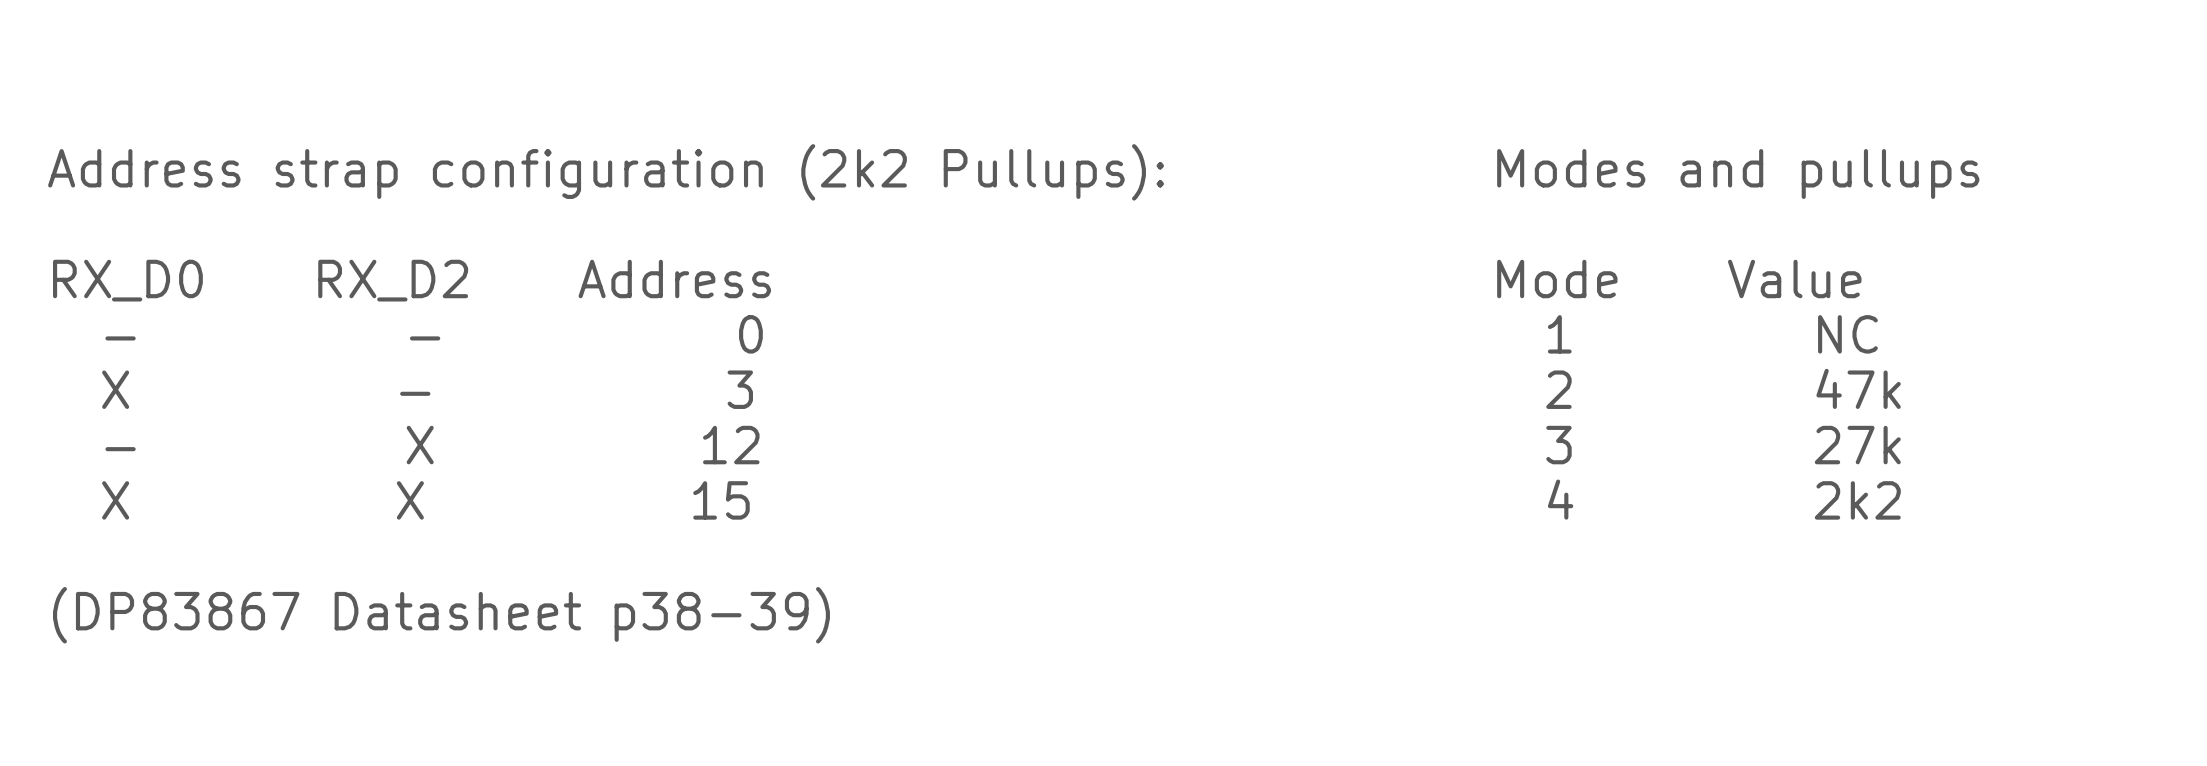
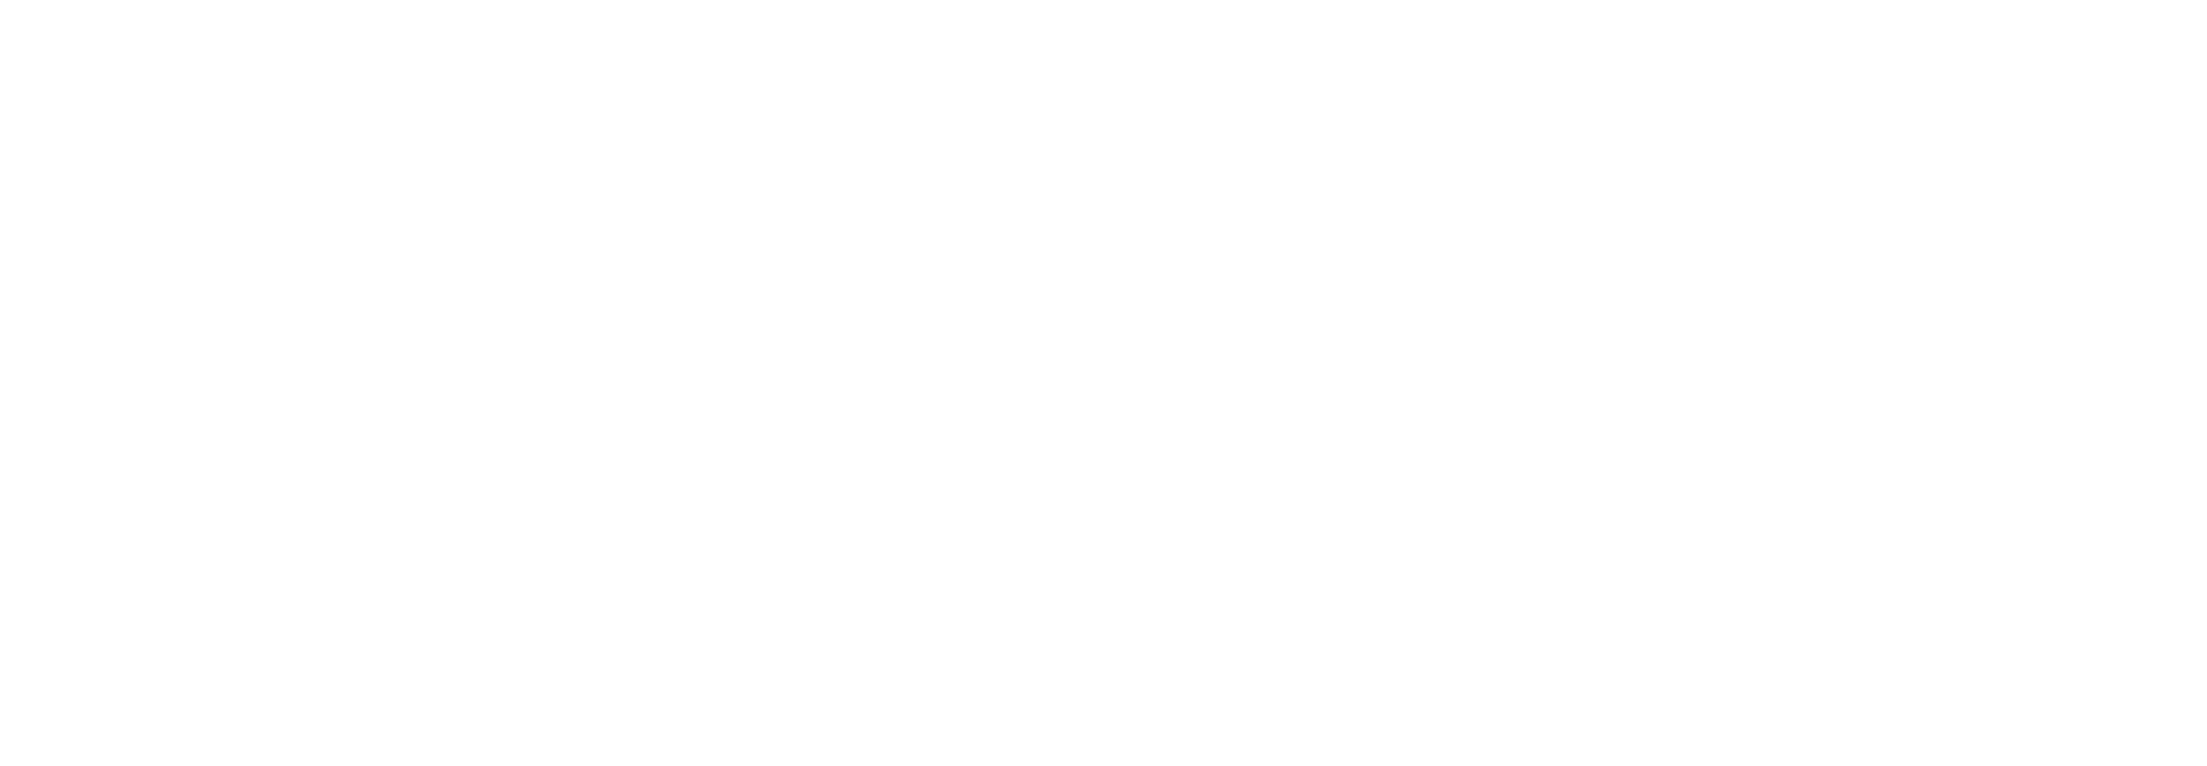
text: Address strap configuration (2k2 Pullups): (606, 172) -> none
text: Modes and pullups (1738, 174) -> none
text: Mode Value (1679, 278) -> none
text: RX_D0 RX_D2 Address (412, 280) -> none
text: - - 0 (434, 334) -> none
text: 1 NC (1712, 334) -> none
text: 2 47k (1723, 388) -> none
text: X - 3 (427, 389) -> none
text: - X 12 (432, 445) -> none
text: 3 27k (1723, 445) -> none
text: 4 2k2 (1724, 499) -> none
text: X X 15 (425, 500) -> none
text: (DP83867 Datasheet p38-39) (441, 615) -> none

